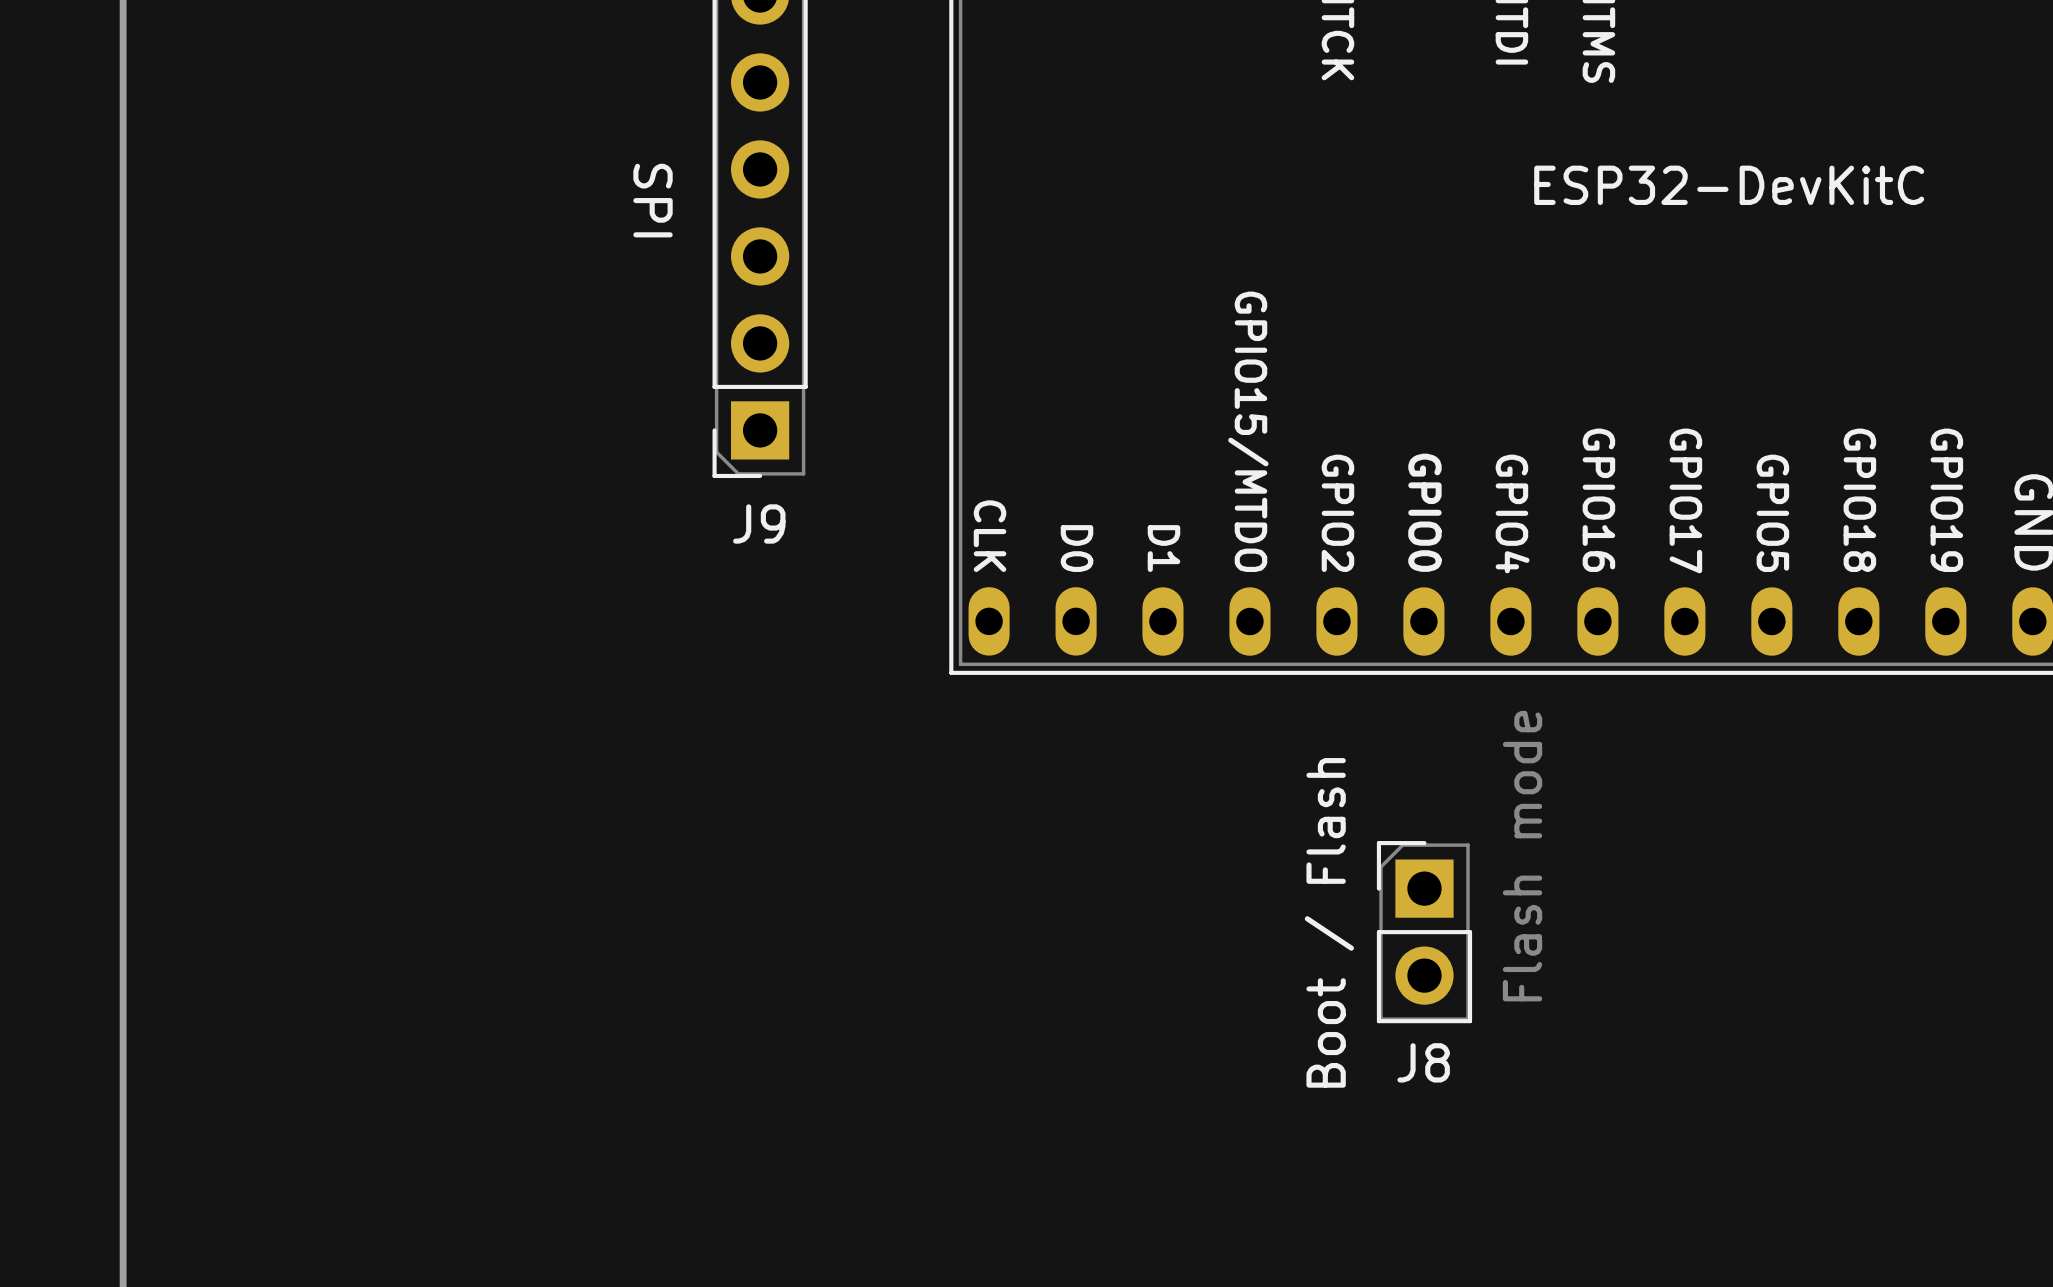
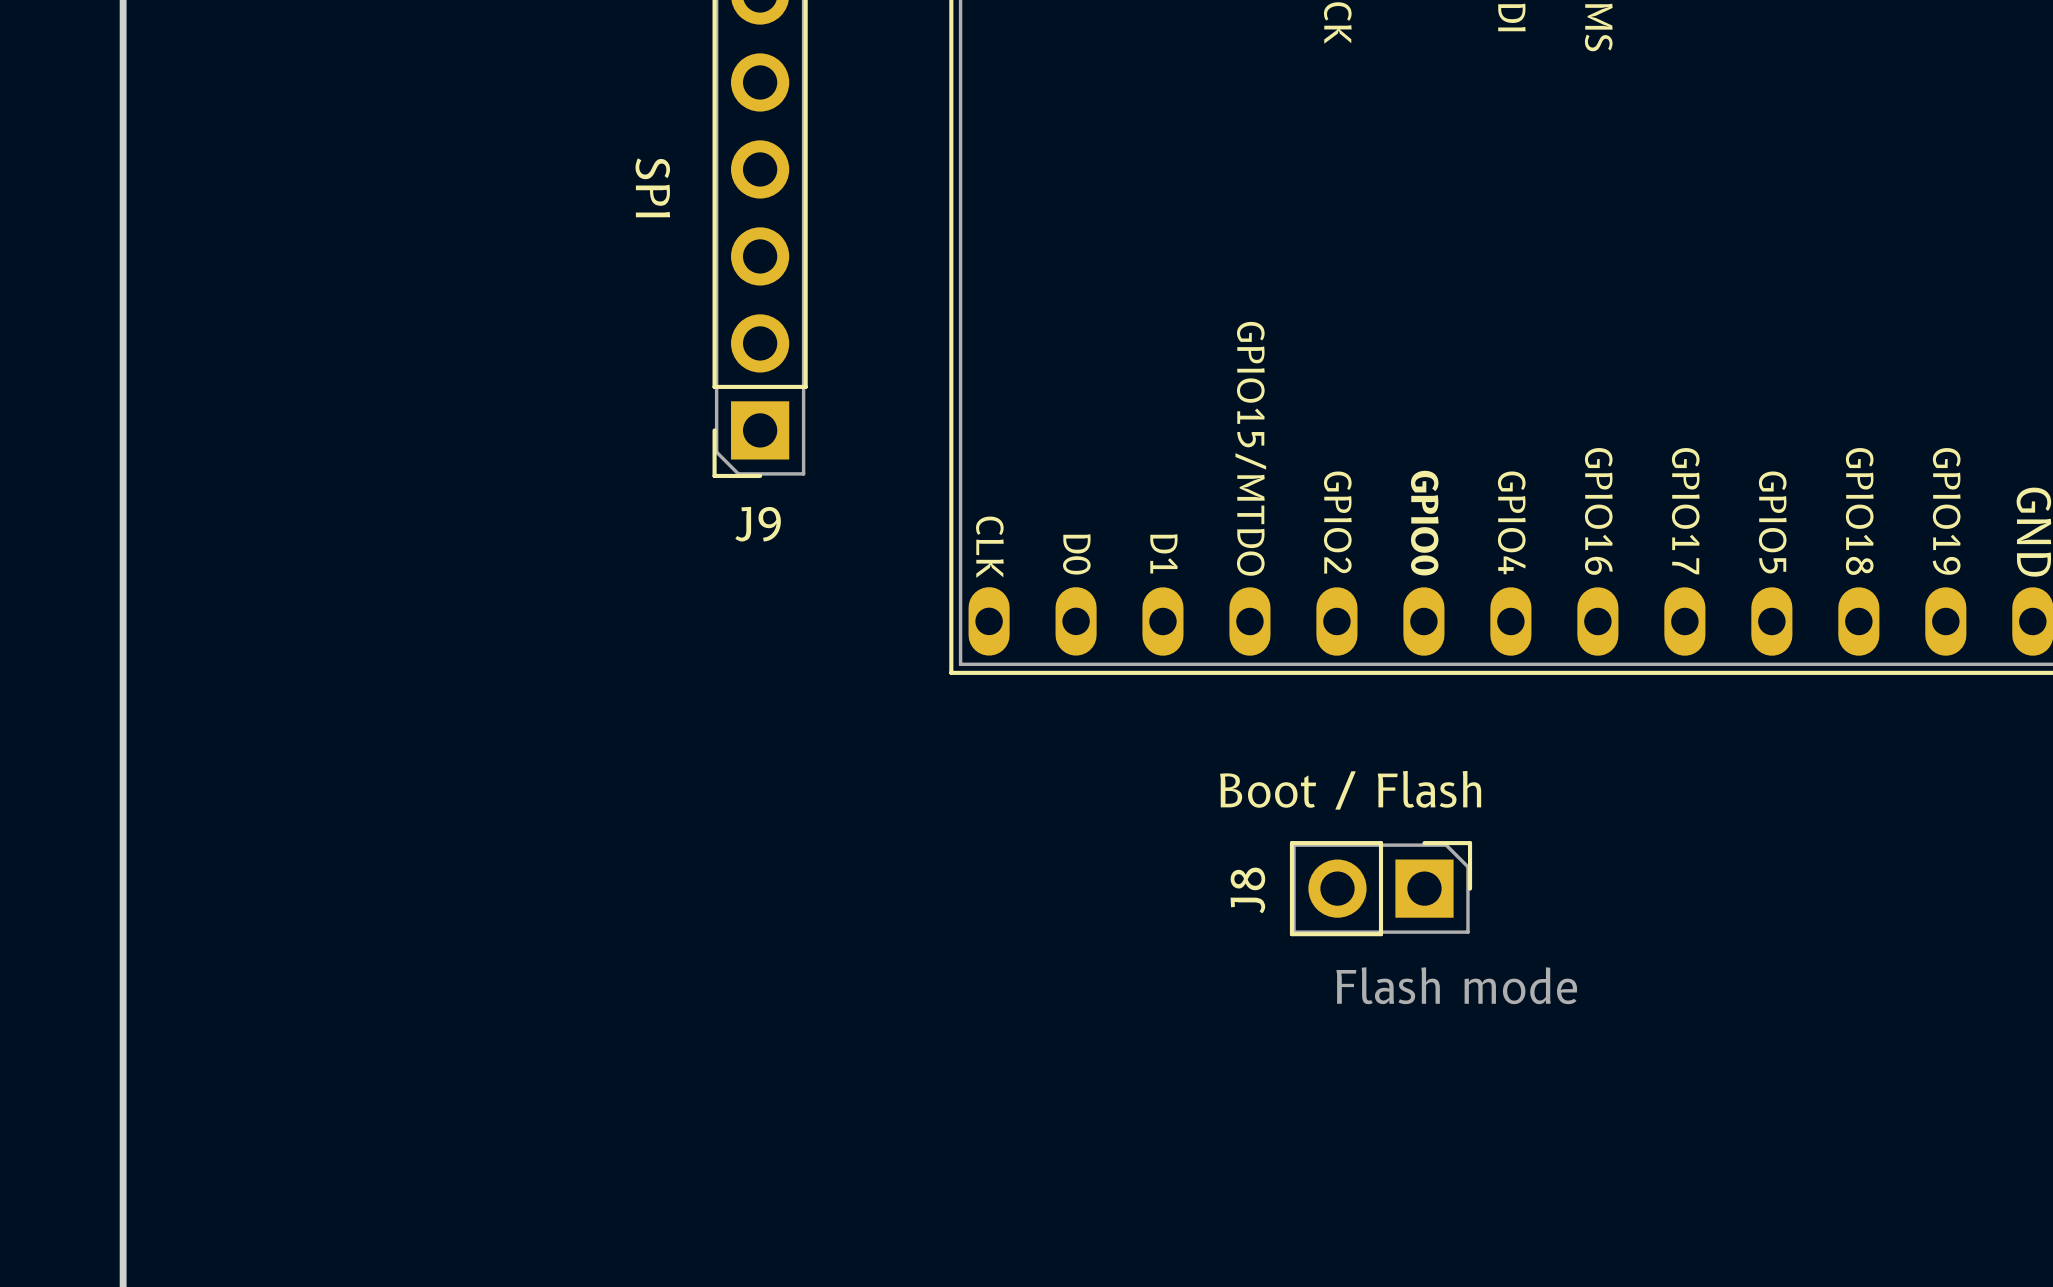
part value: ESP32-DevKitC (1729, 185) -> none
J8 rotation: 0° (1424, 932) -> 90° clockwise (1381, 888)

